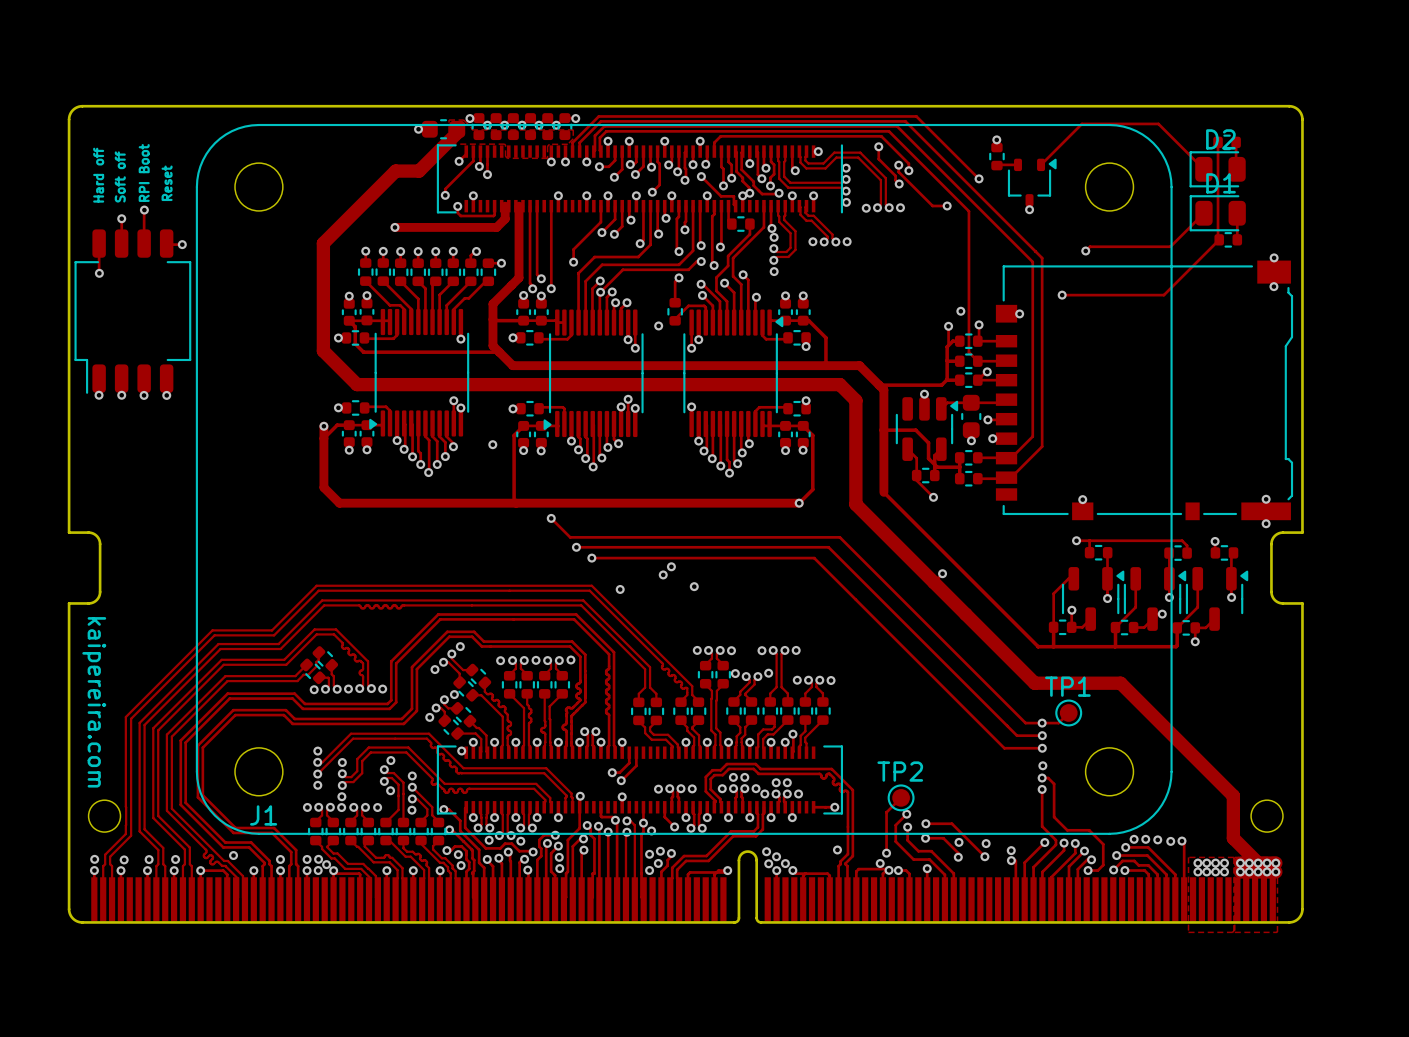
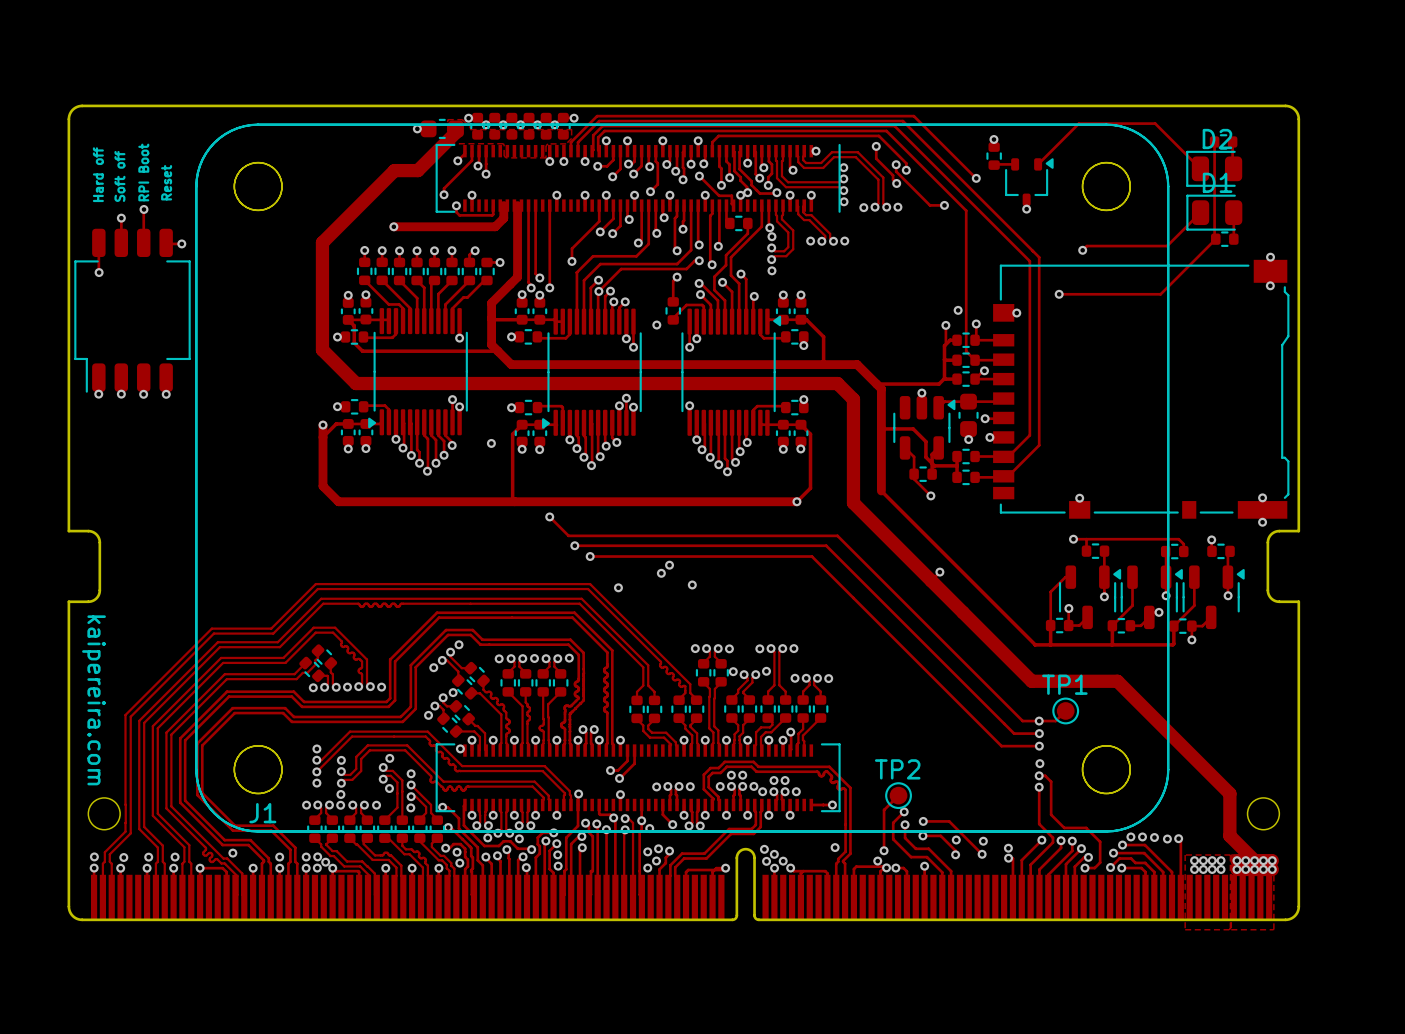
part: (684, 479) -> none
part: none -> (682, 478)
part: none -> (682, 478)

